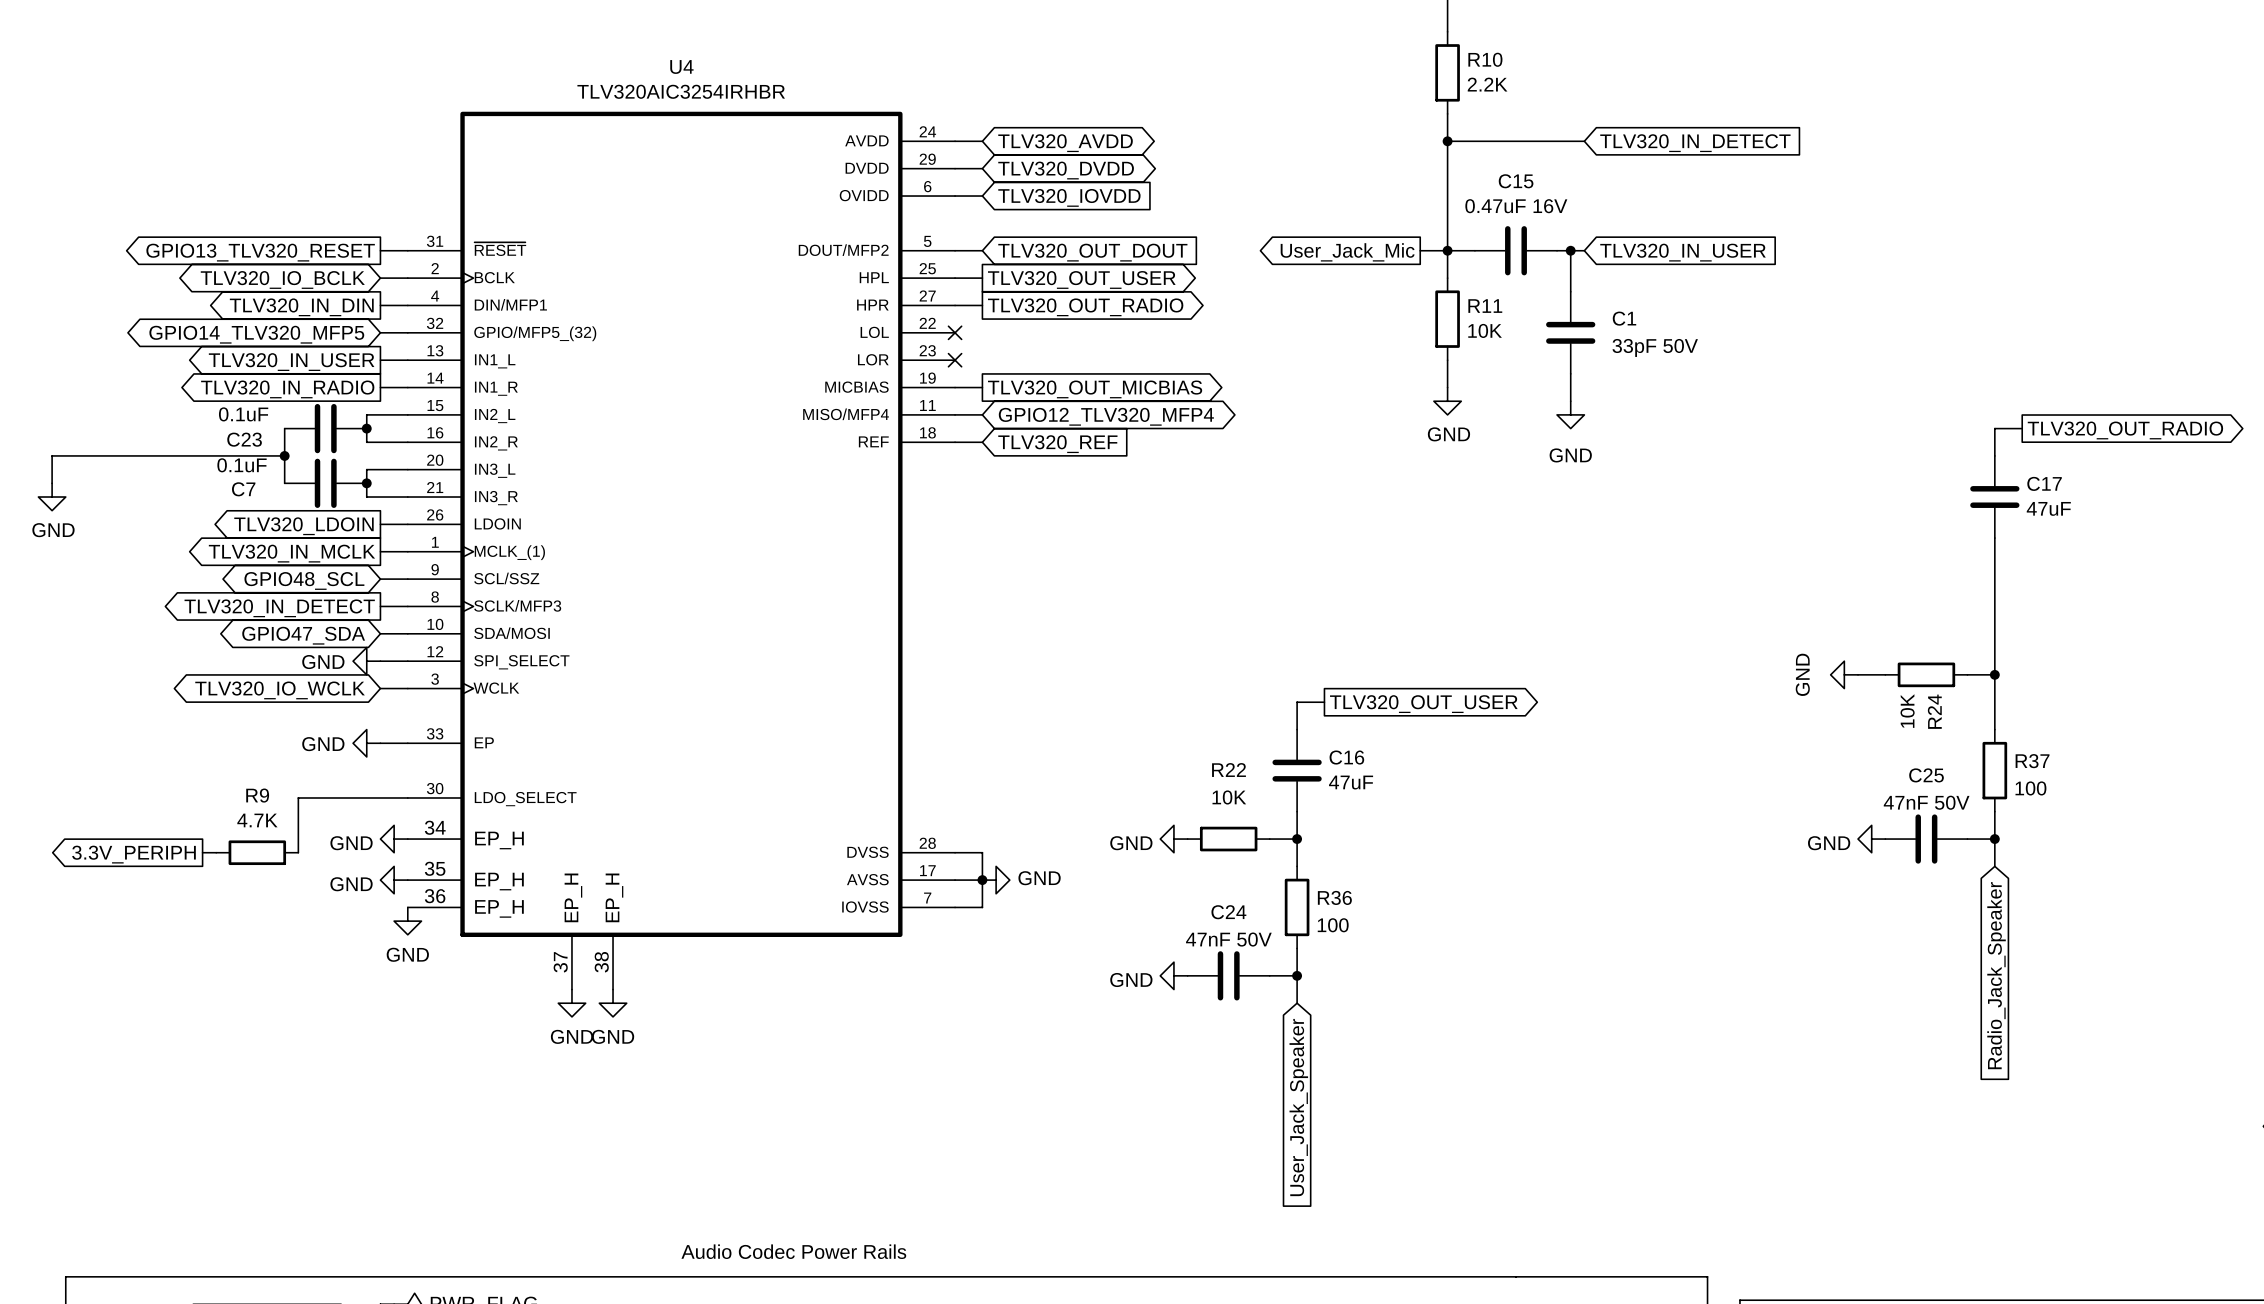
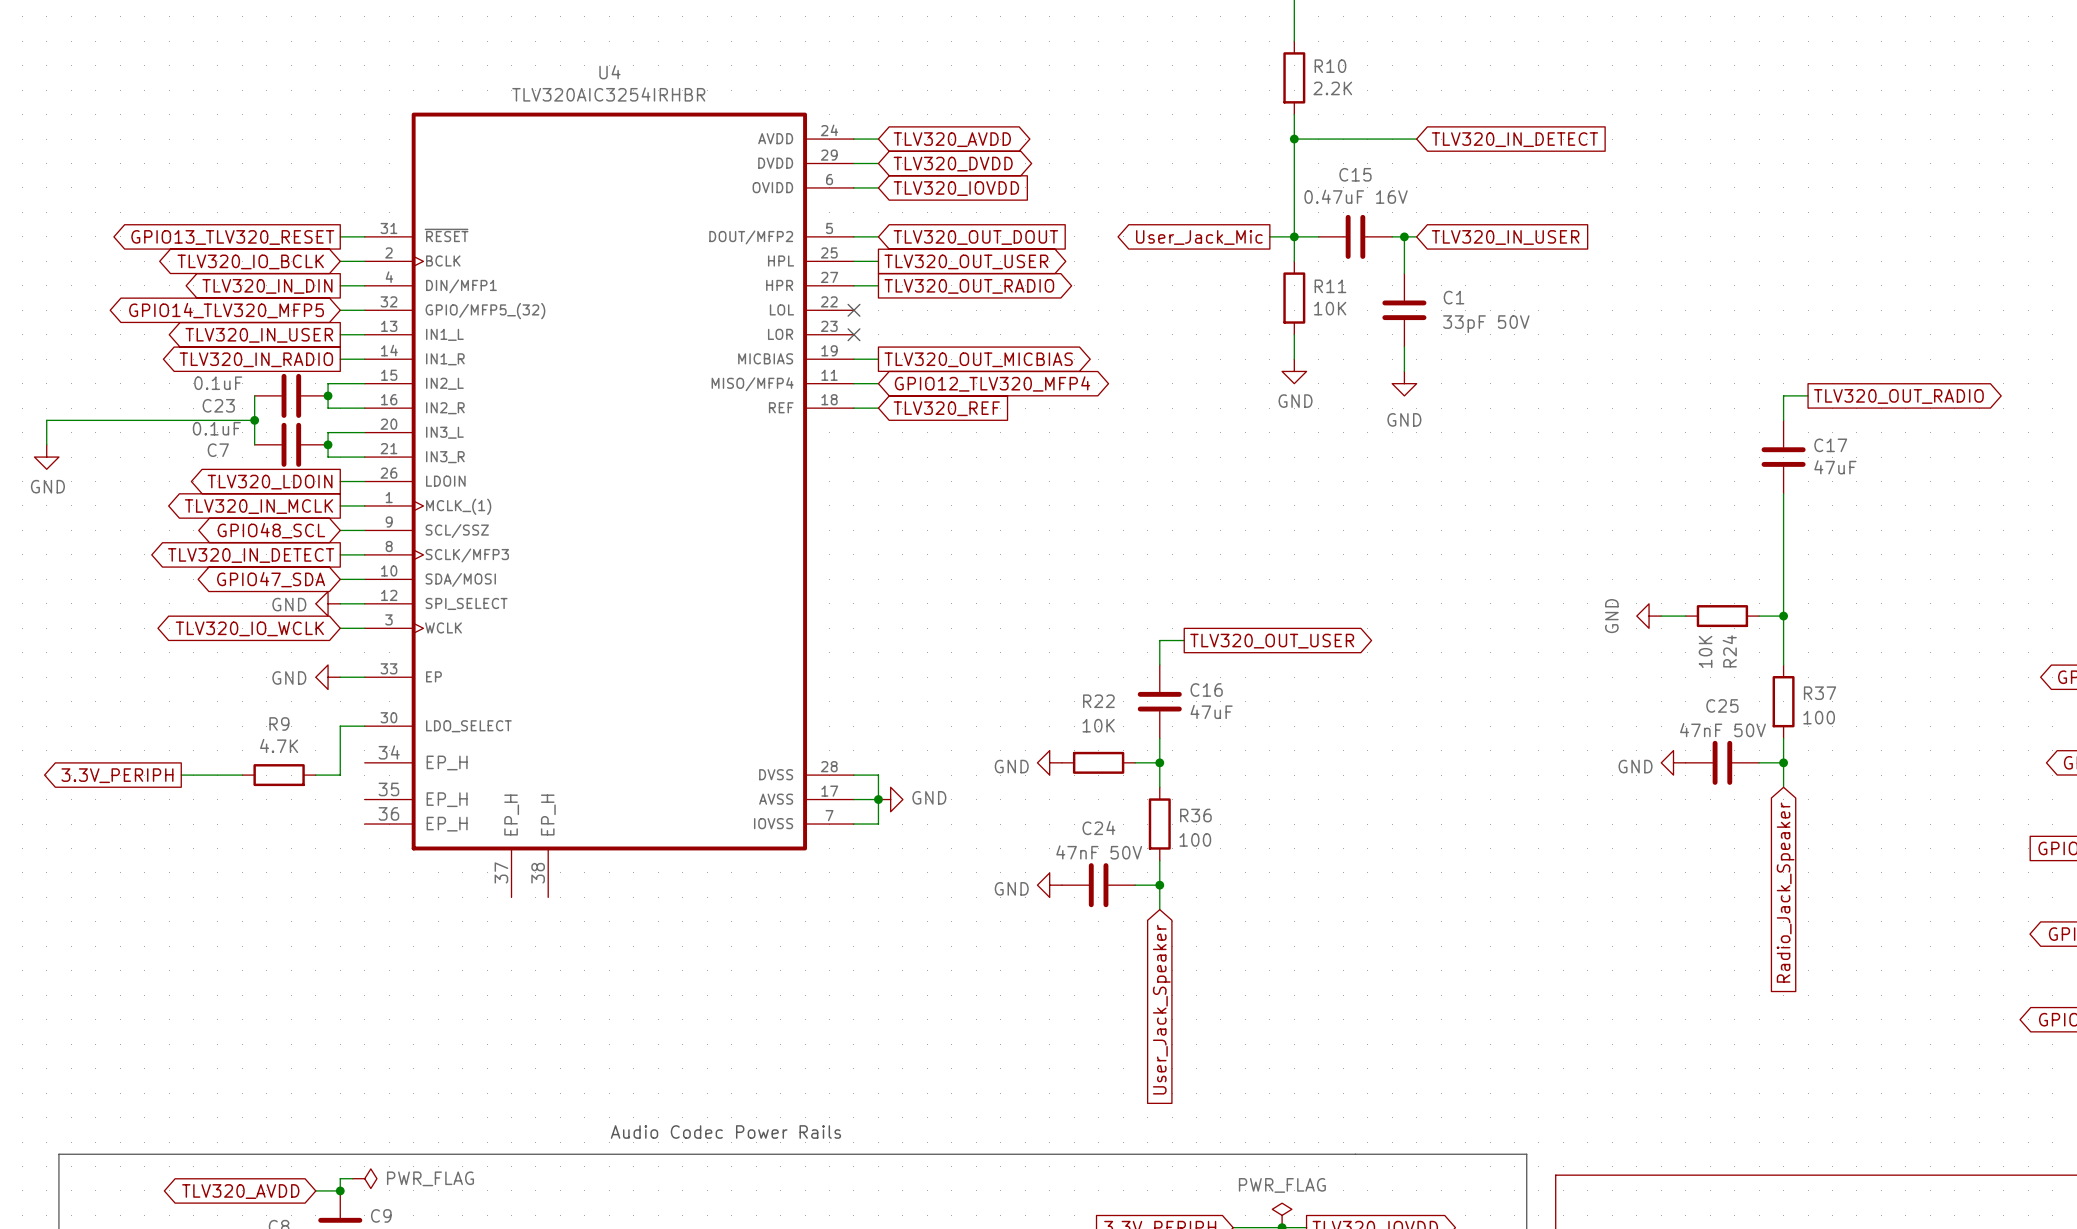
wire: (380, 797) (298, 797) (298, 852) -> (340, 726) (340, 775) (315, 775)
power symbol: GND (394, 839) -> none
wire: none -> (193, 775) (242, 775)
R9 position: (257, 852) -> (279, 775)
power symbol: GND (394, 880) -> none
power symbol: GND (407, 921) -> none
power symbol: GND (571, 1003) -> none
power symbol: GND (613, 1003) -> none

